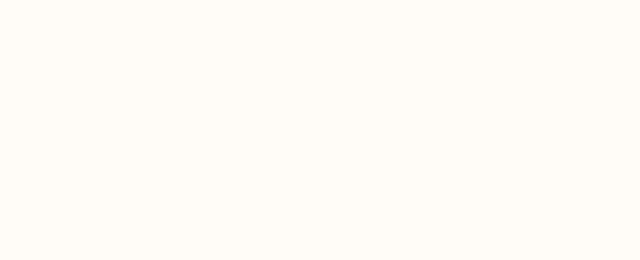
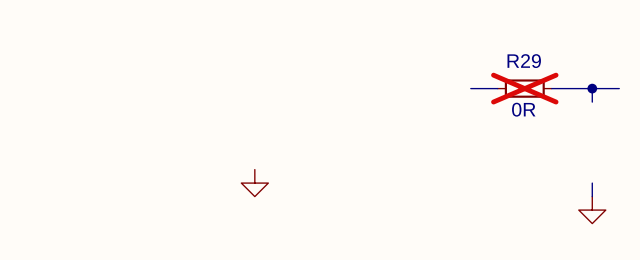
wire: none -> (470, 88) (497, 88)
R29: none -> 0R (524, 88)
wire: none -> (551, 88) (619, 88)
wire: none -> (592, 88) (592, 102)
junction: none -> (592, 88)
power symbol: none -> (254, 183)
wire: none -> (592, 183) (592, 196)
power symbol: none -> (592, 210)

